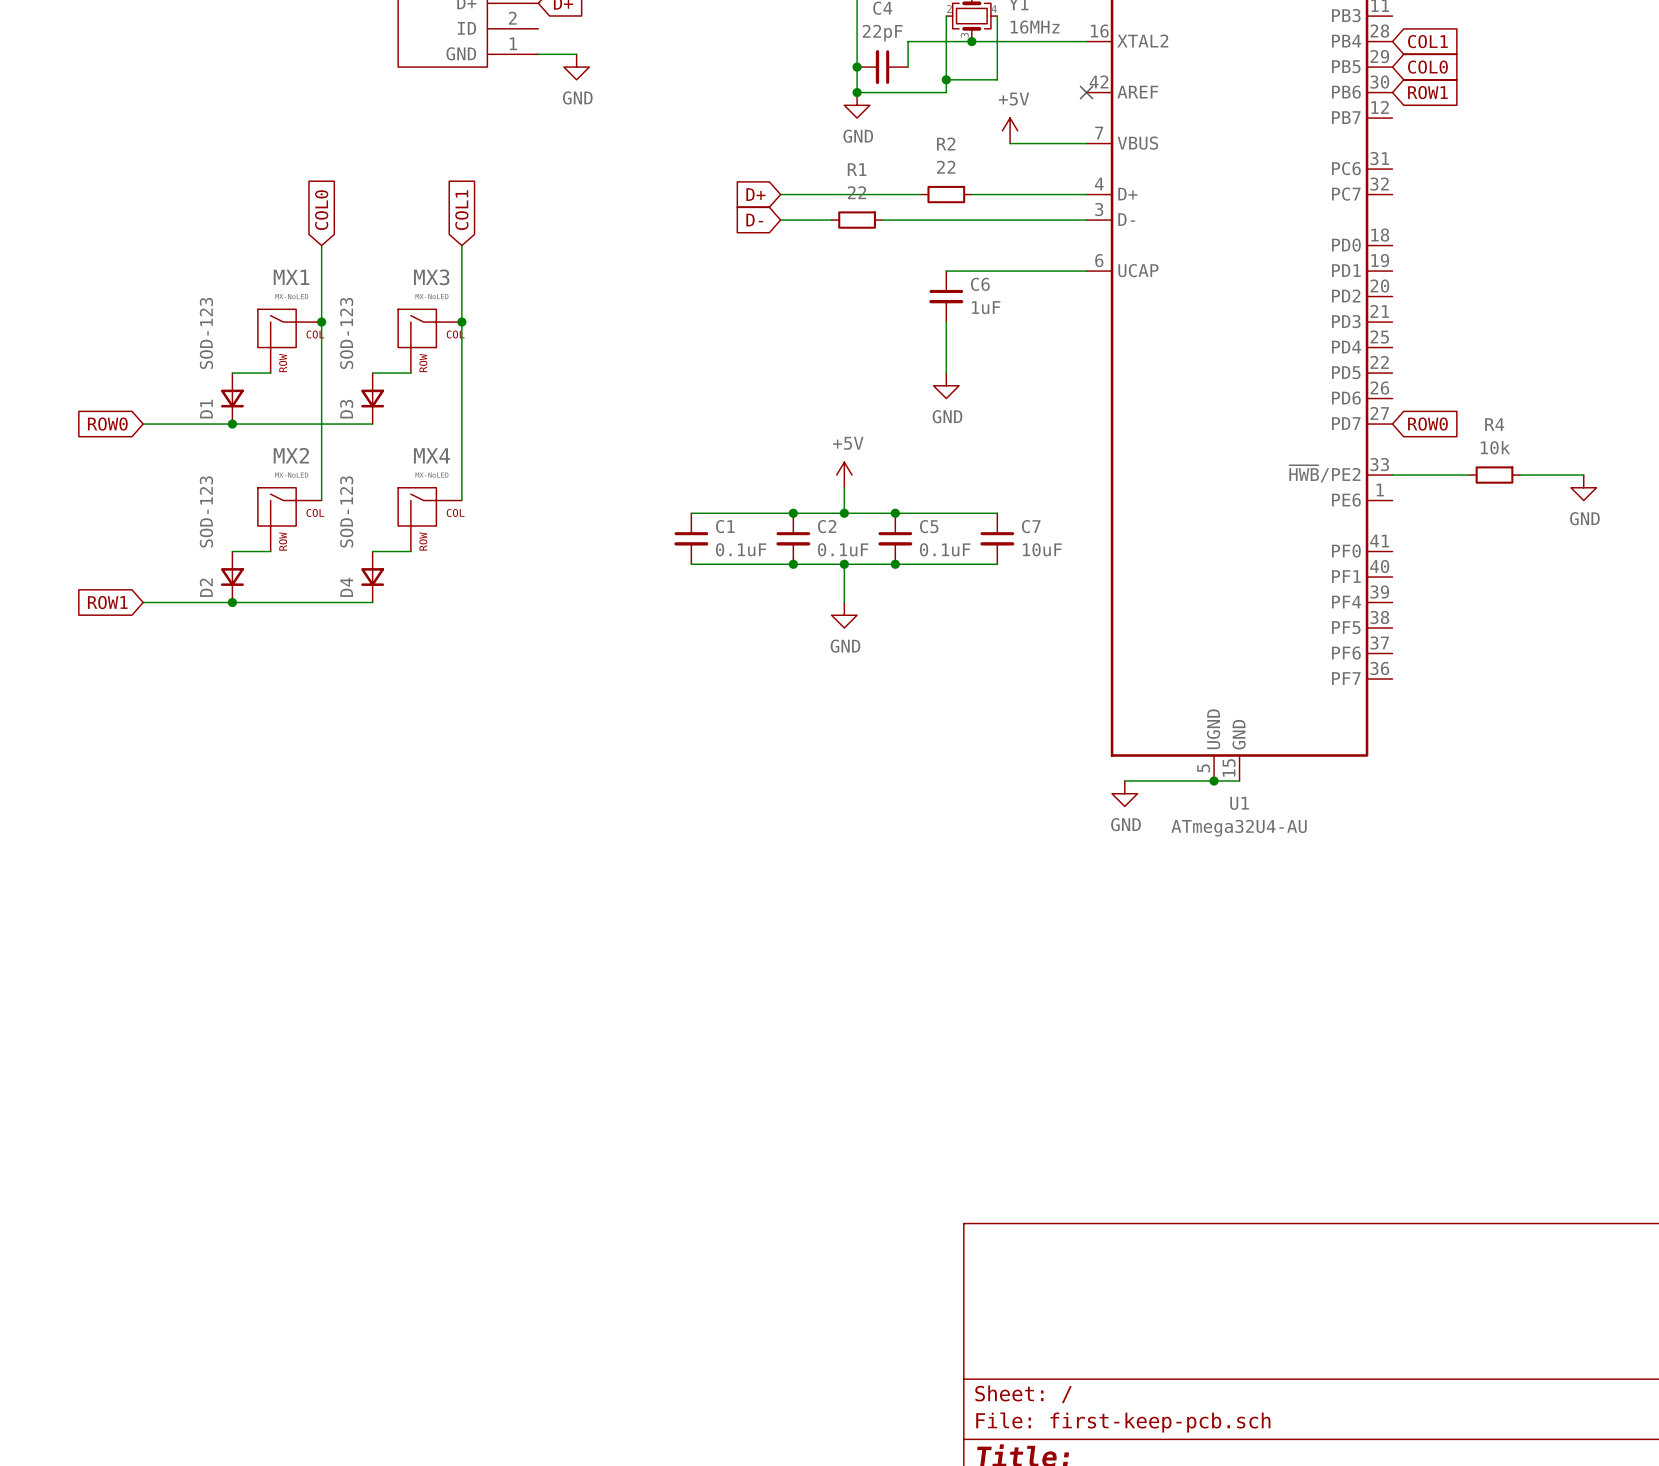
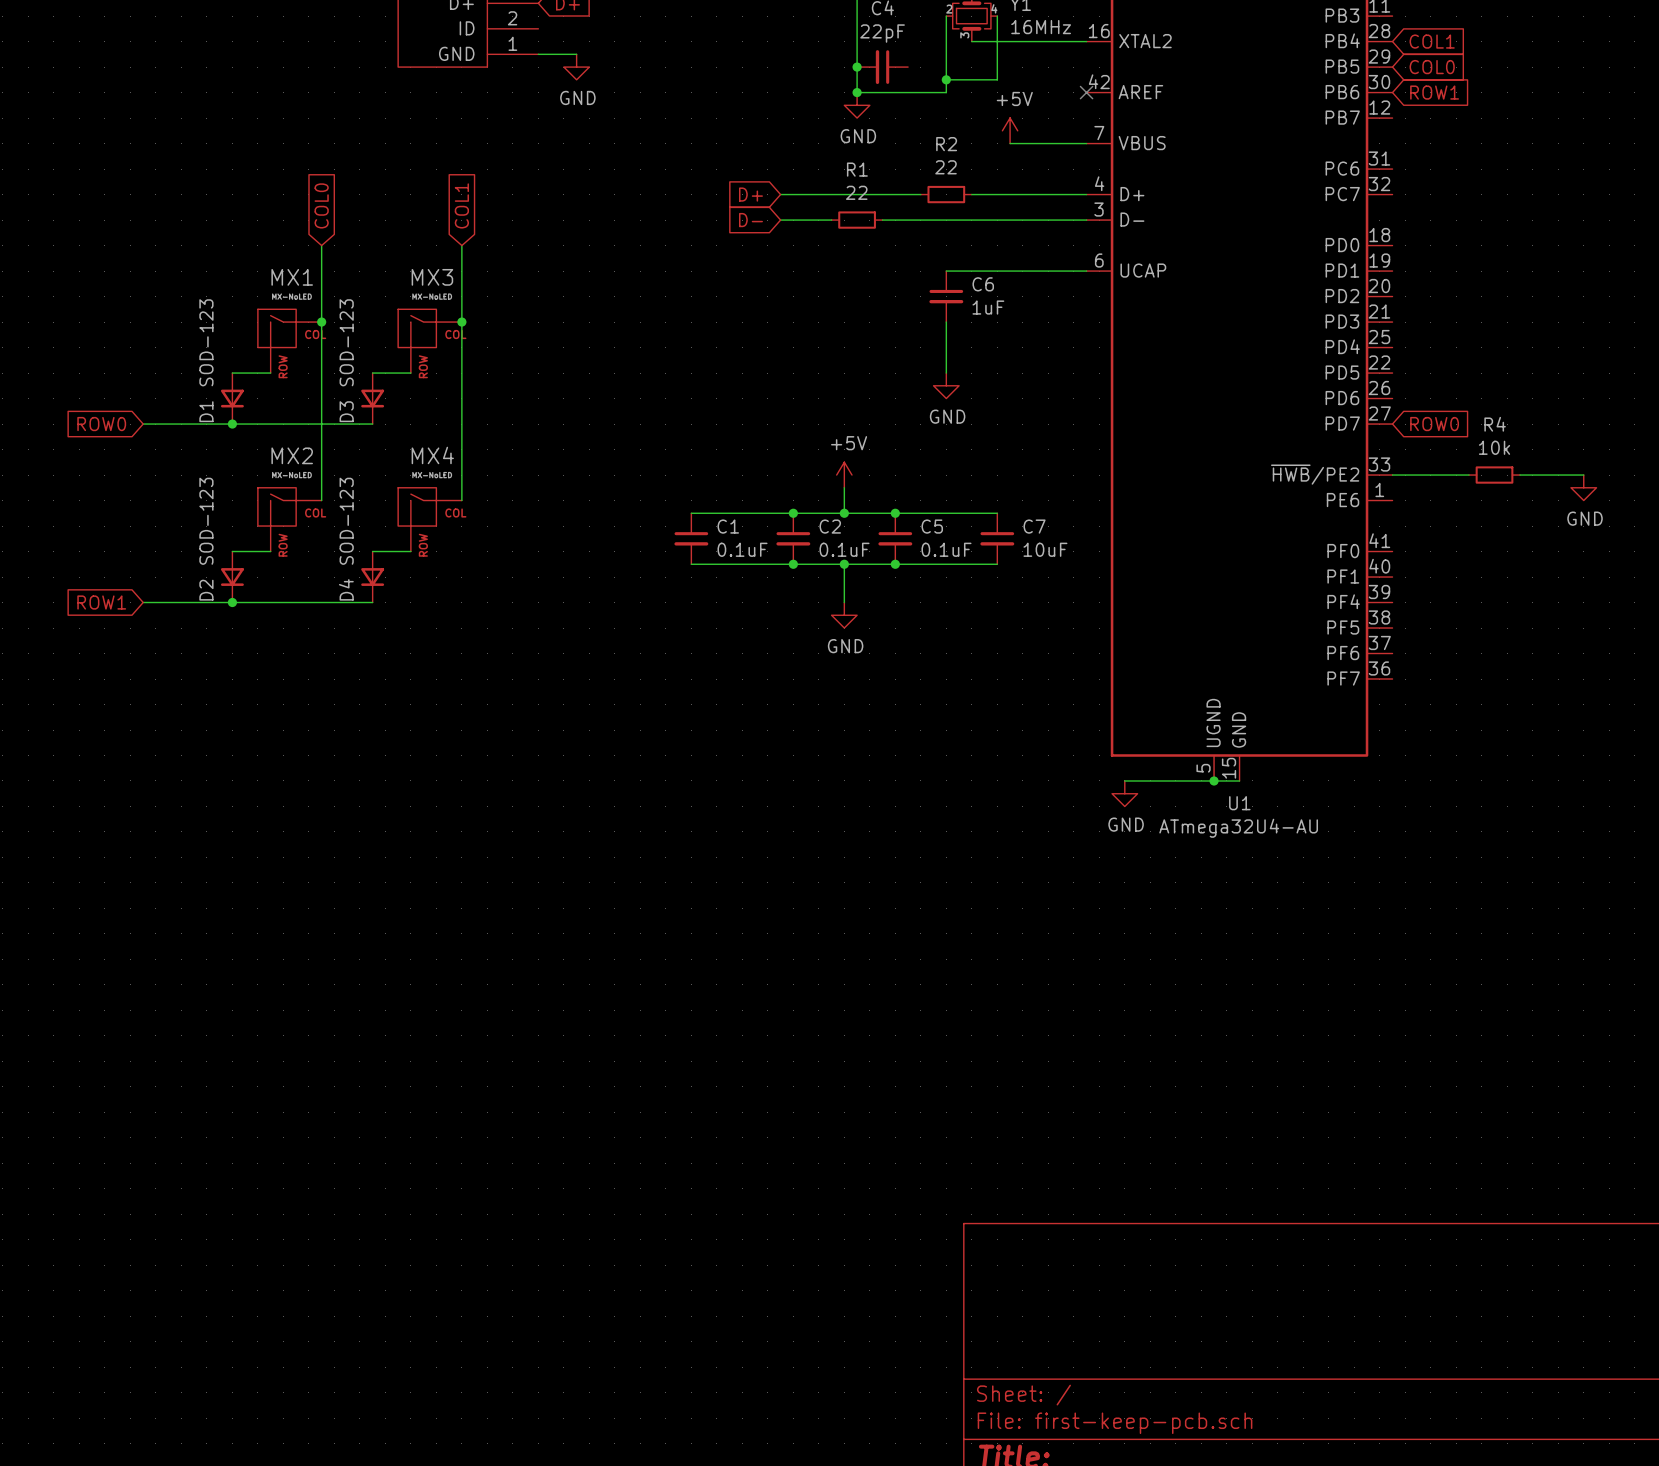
wire: (971, 41) (908, 41) (908, 67) -> none
junction: (971, 41) -> none

